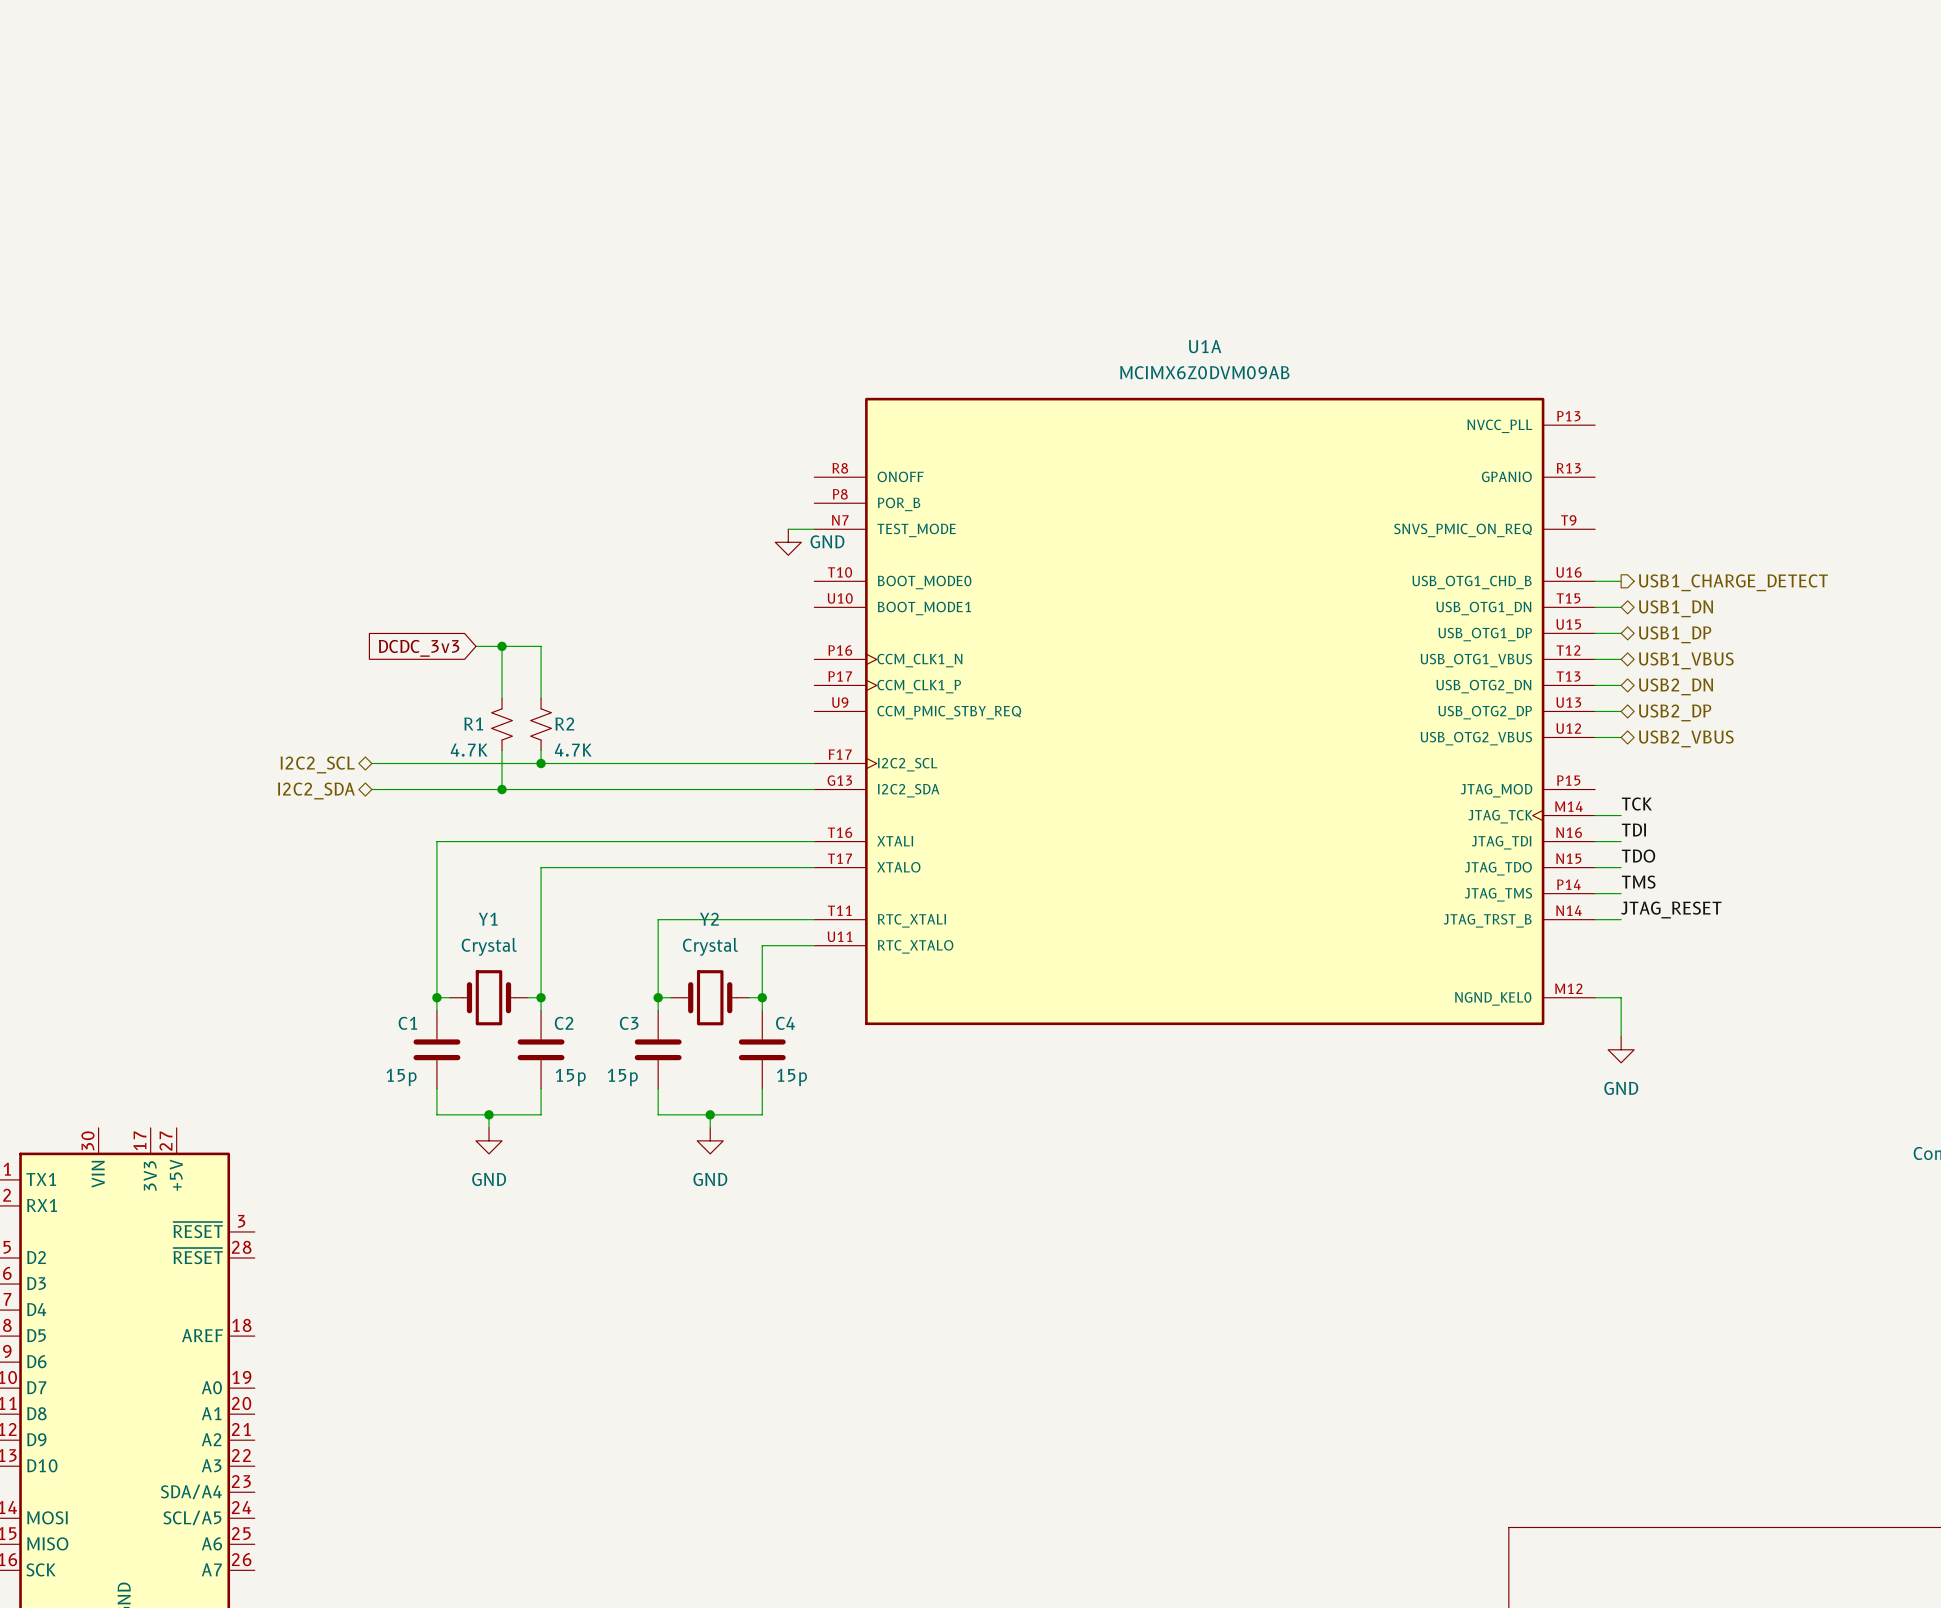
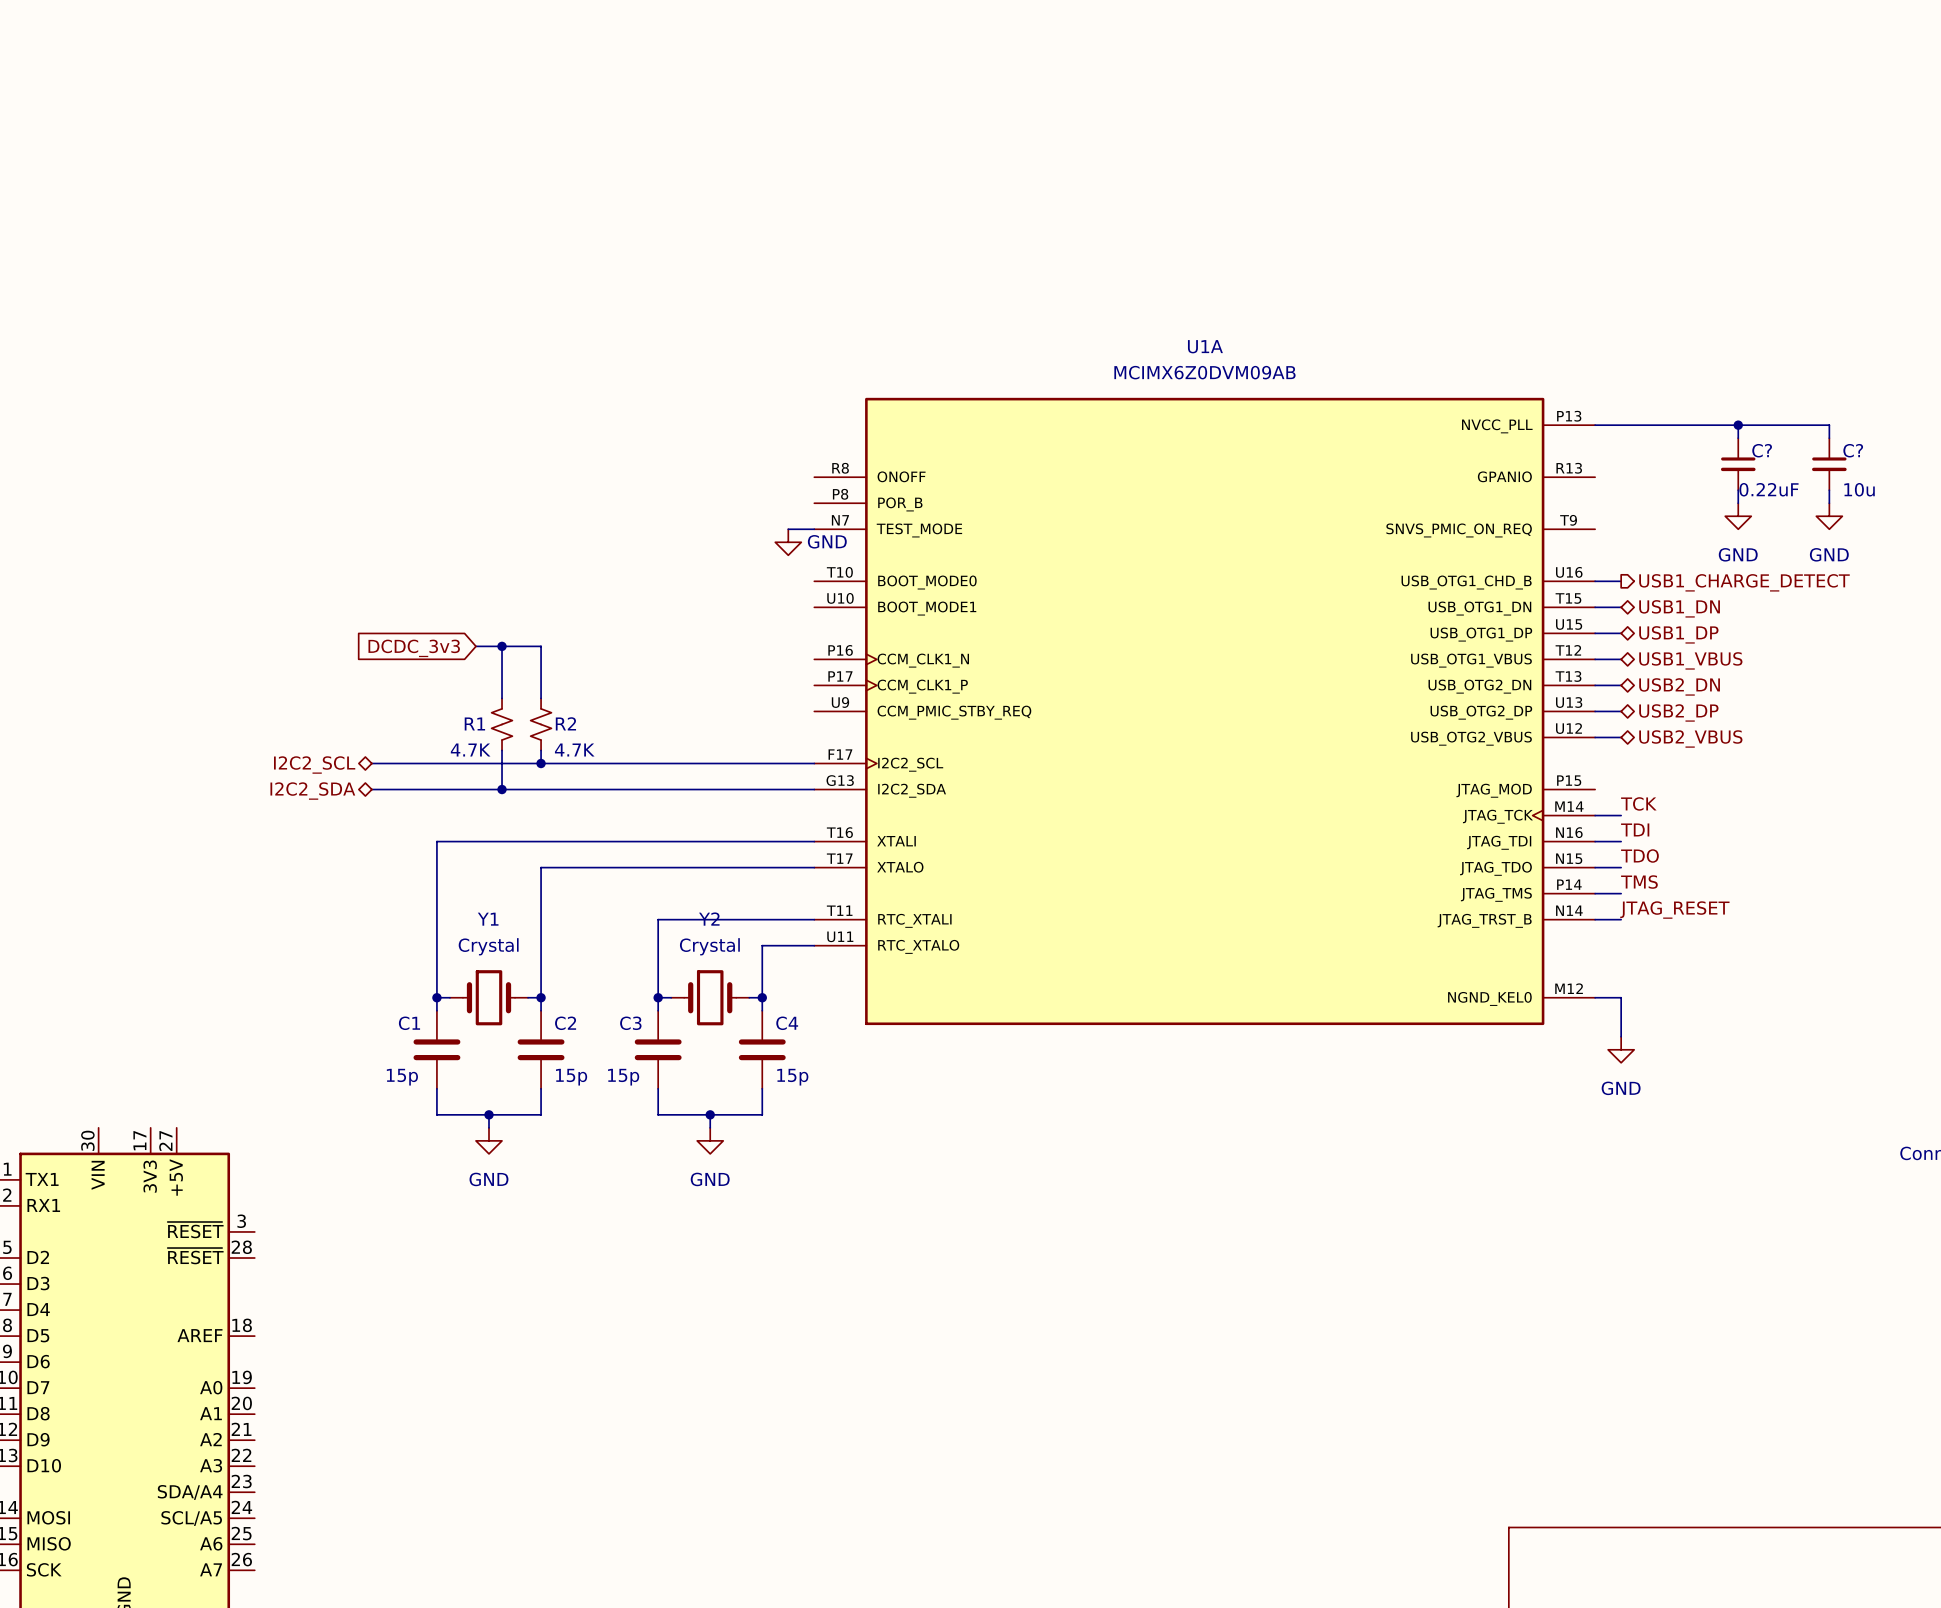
wire: none -> (1595, 425) (1829, 425) (1829, 438)
wire: none -> (1738, 425) (1738, 438)
junction: none -> (1738, 425)
C?: none -> 0.22uF (1738, 464)
C?: none -> 10u (1829, 464)
wire: none -> (1738, 490) (1738, 503)
wire: none -> (1829, 490) (1829, 503)
power symbol: none -> GND (1738, 516)
power symbol: none -> GND (1829, 516)

